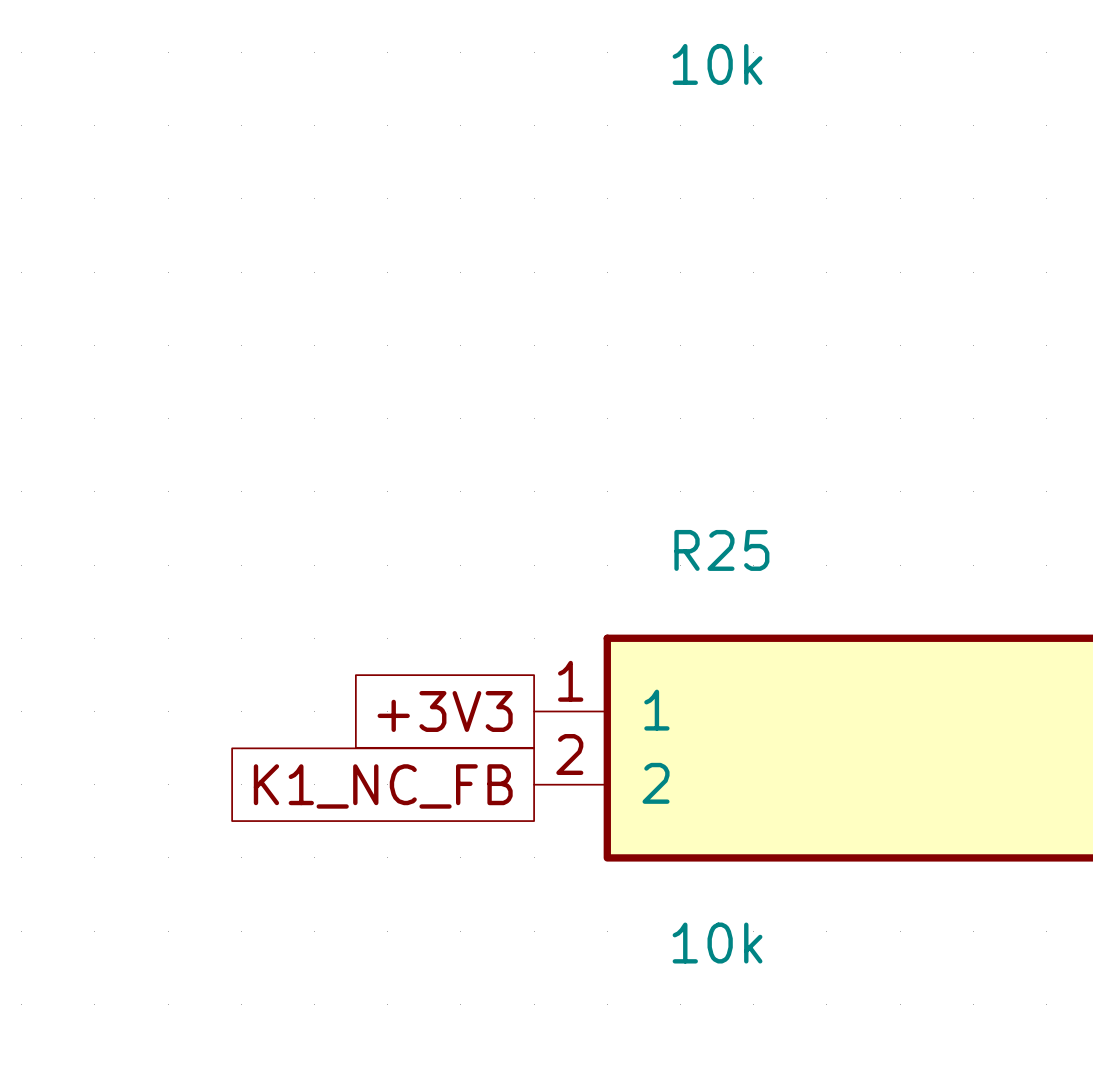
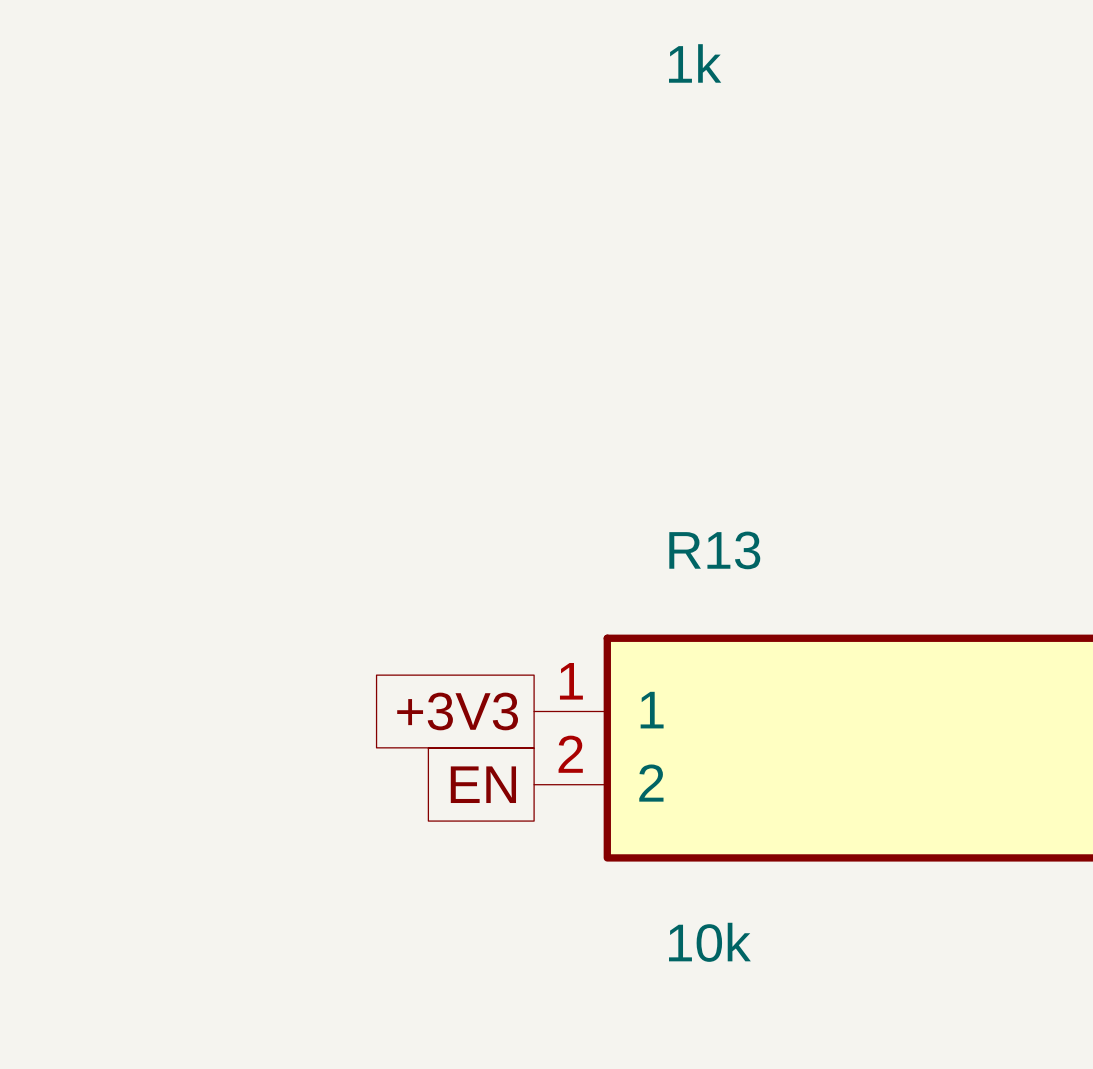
part value: 10k (717, 64) -> 1k (695, 63)
R25 name: R25 (721, 550) -> R13 (714, 550)
global label: K1_NC_FB (383, 786) -> EN (483, 784)

